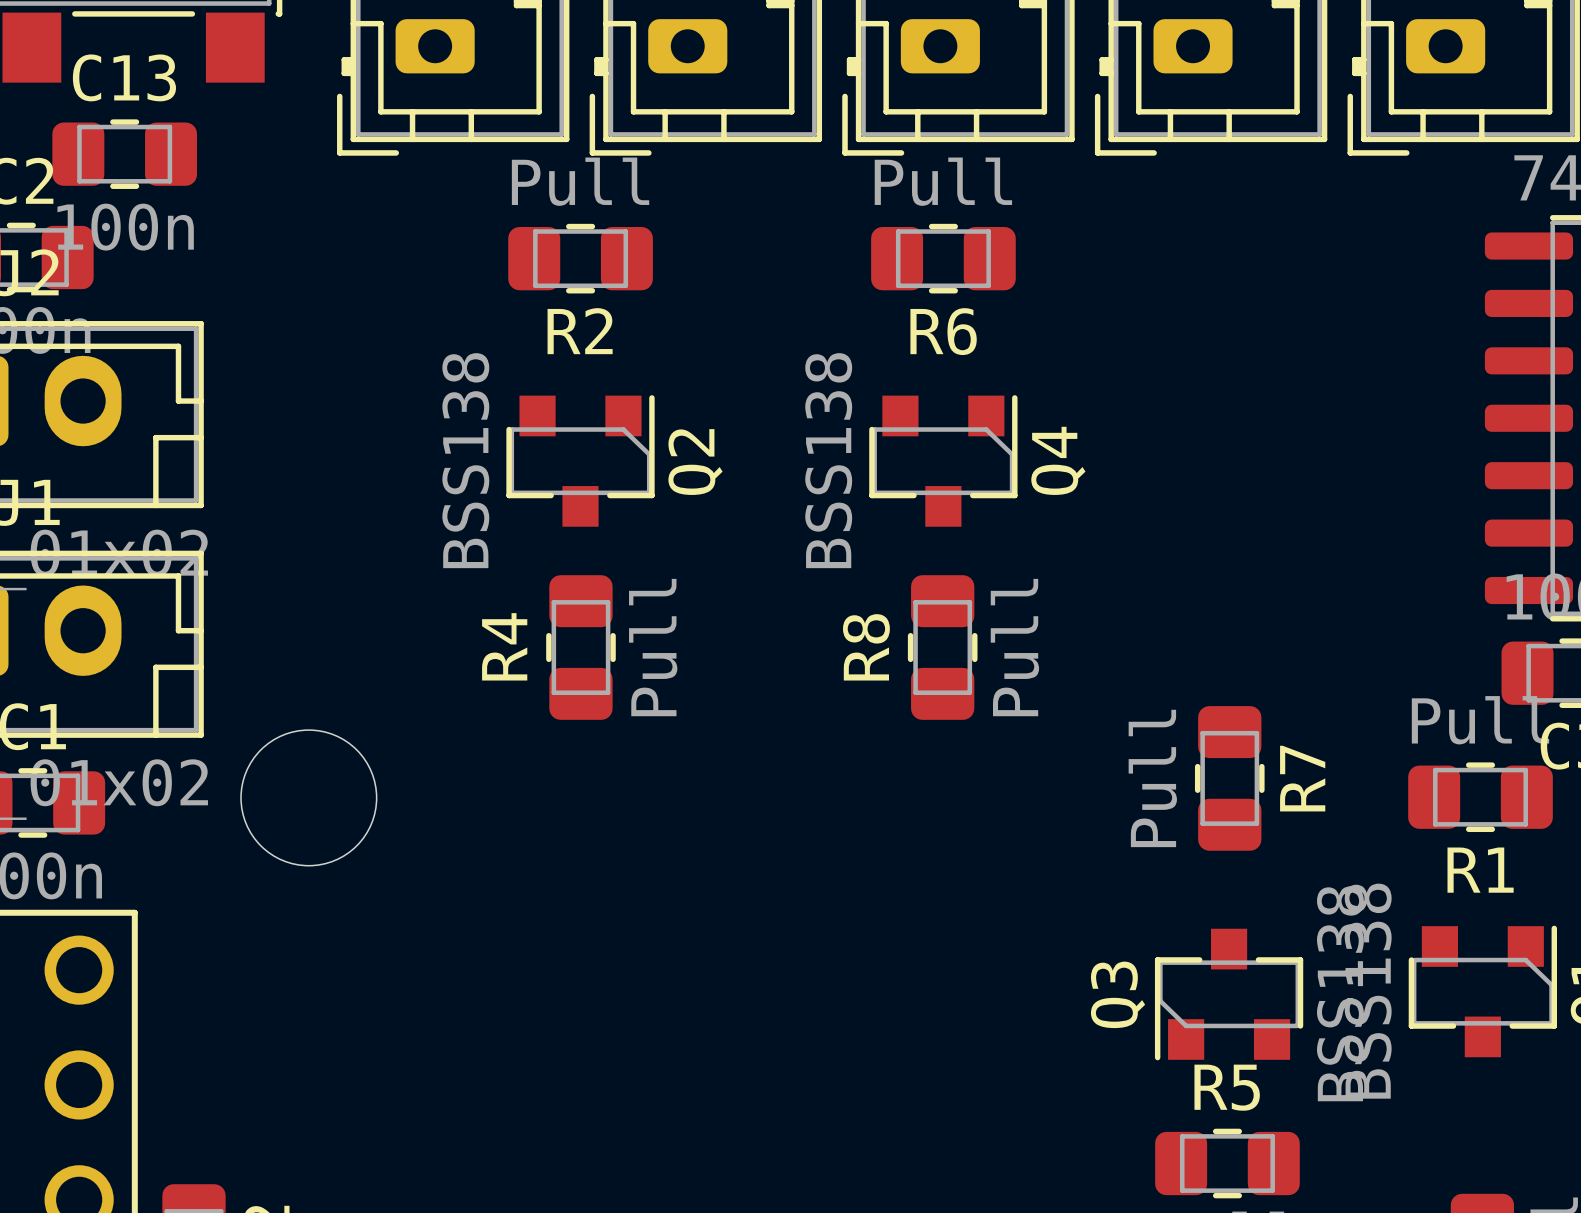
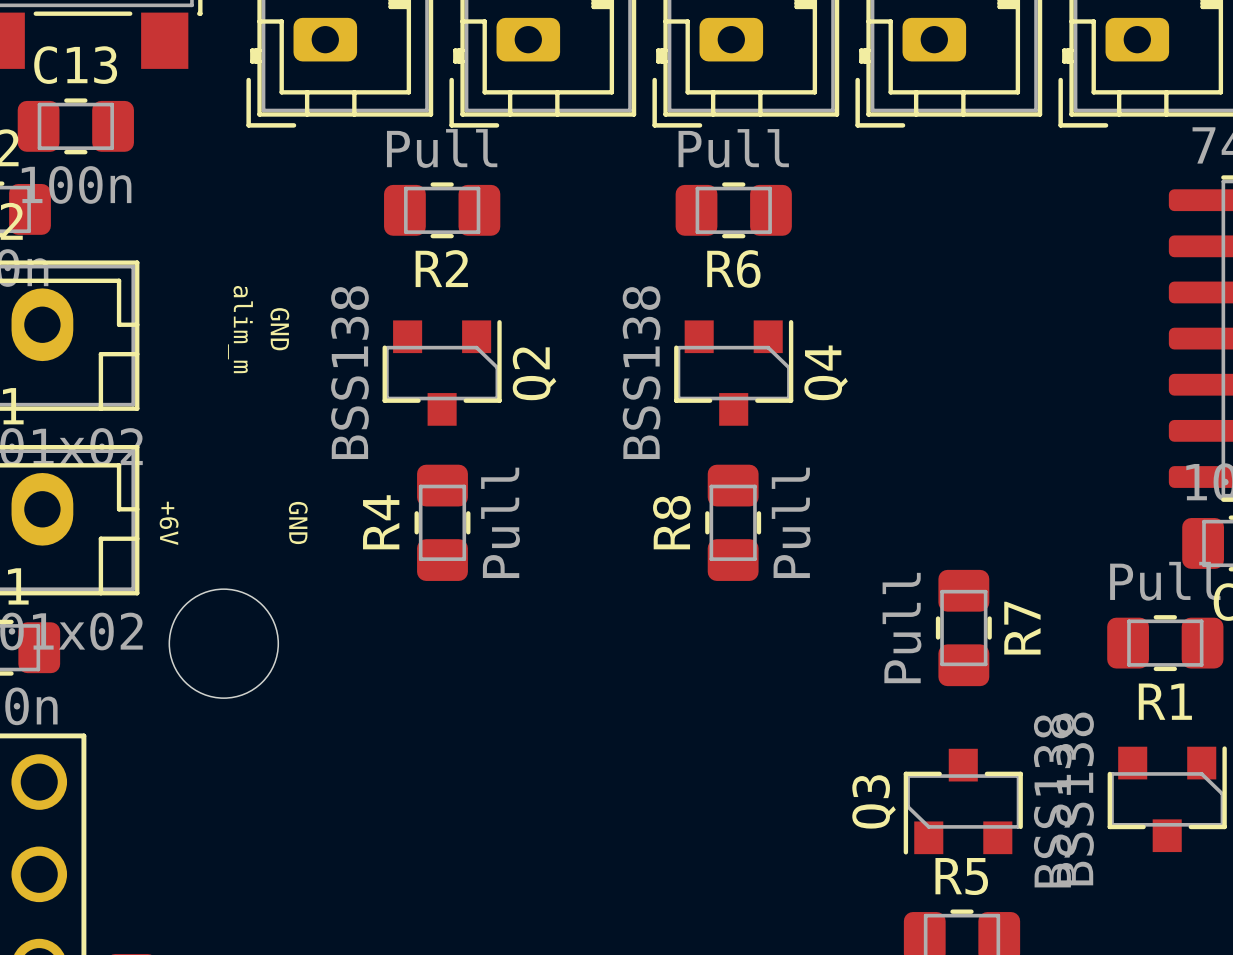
text: none -> GND (279, 329)
text: none -> alim_m (240, 329)
text: none -> GND (298, 522)
text: none -> +6V (169, 523)

